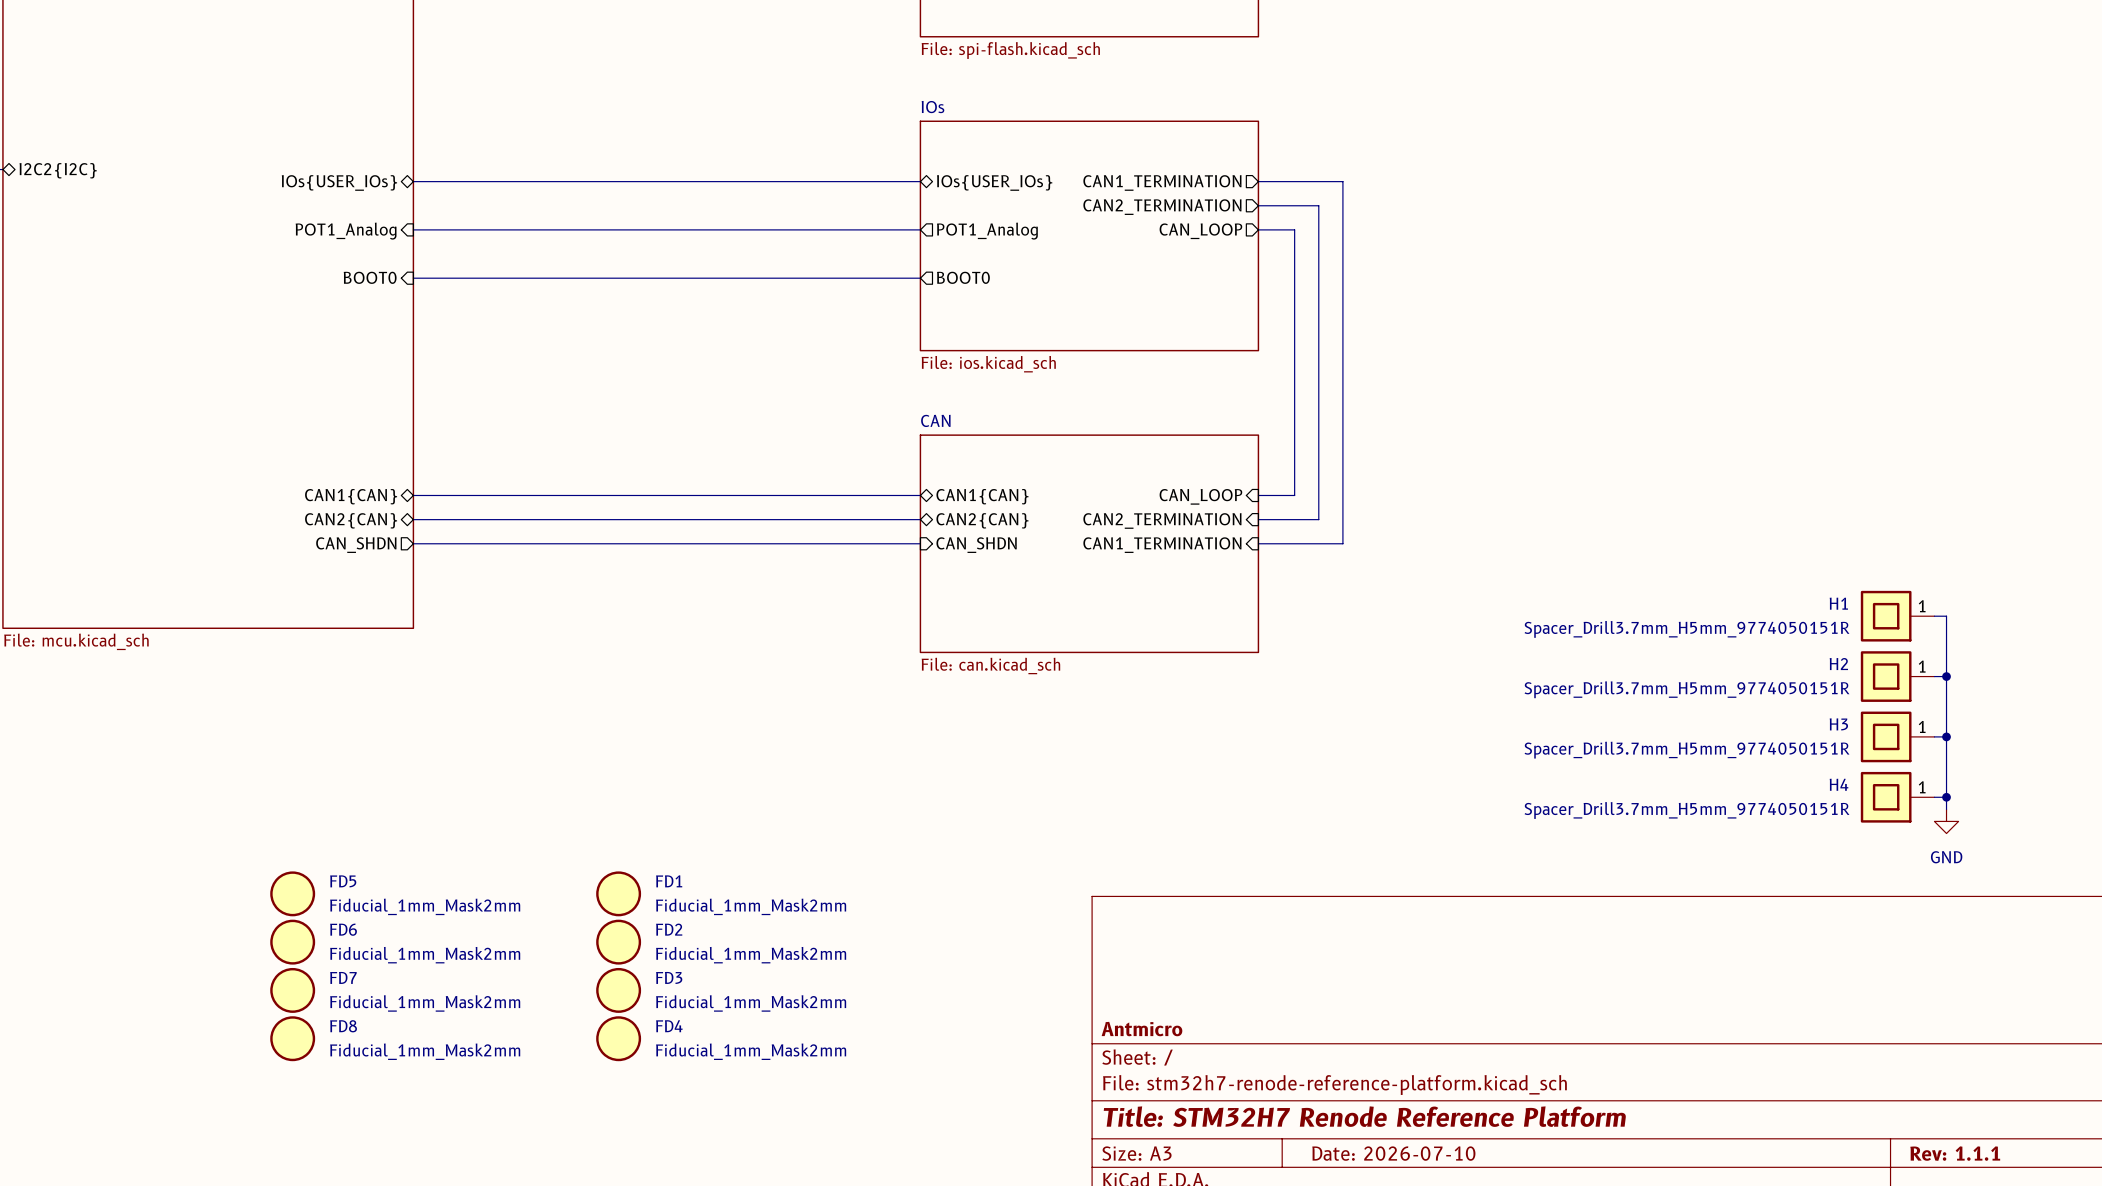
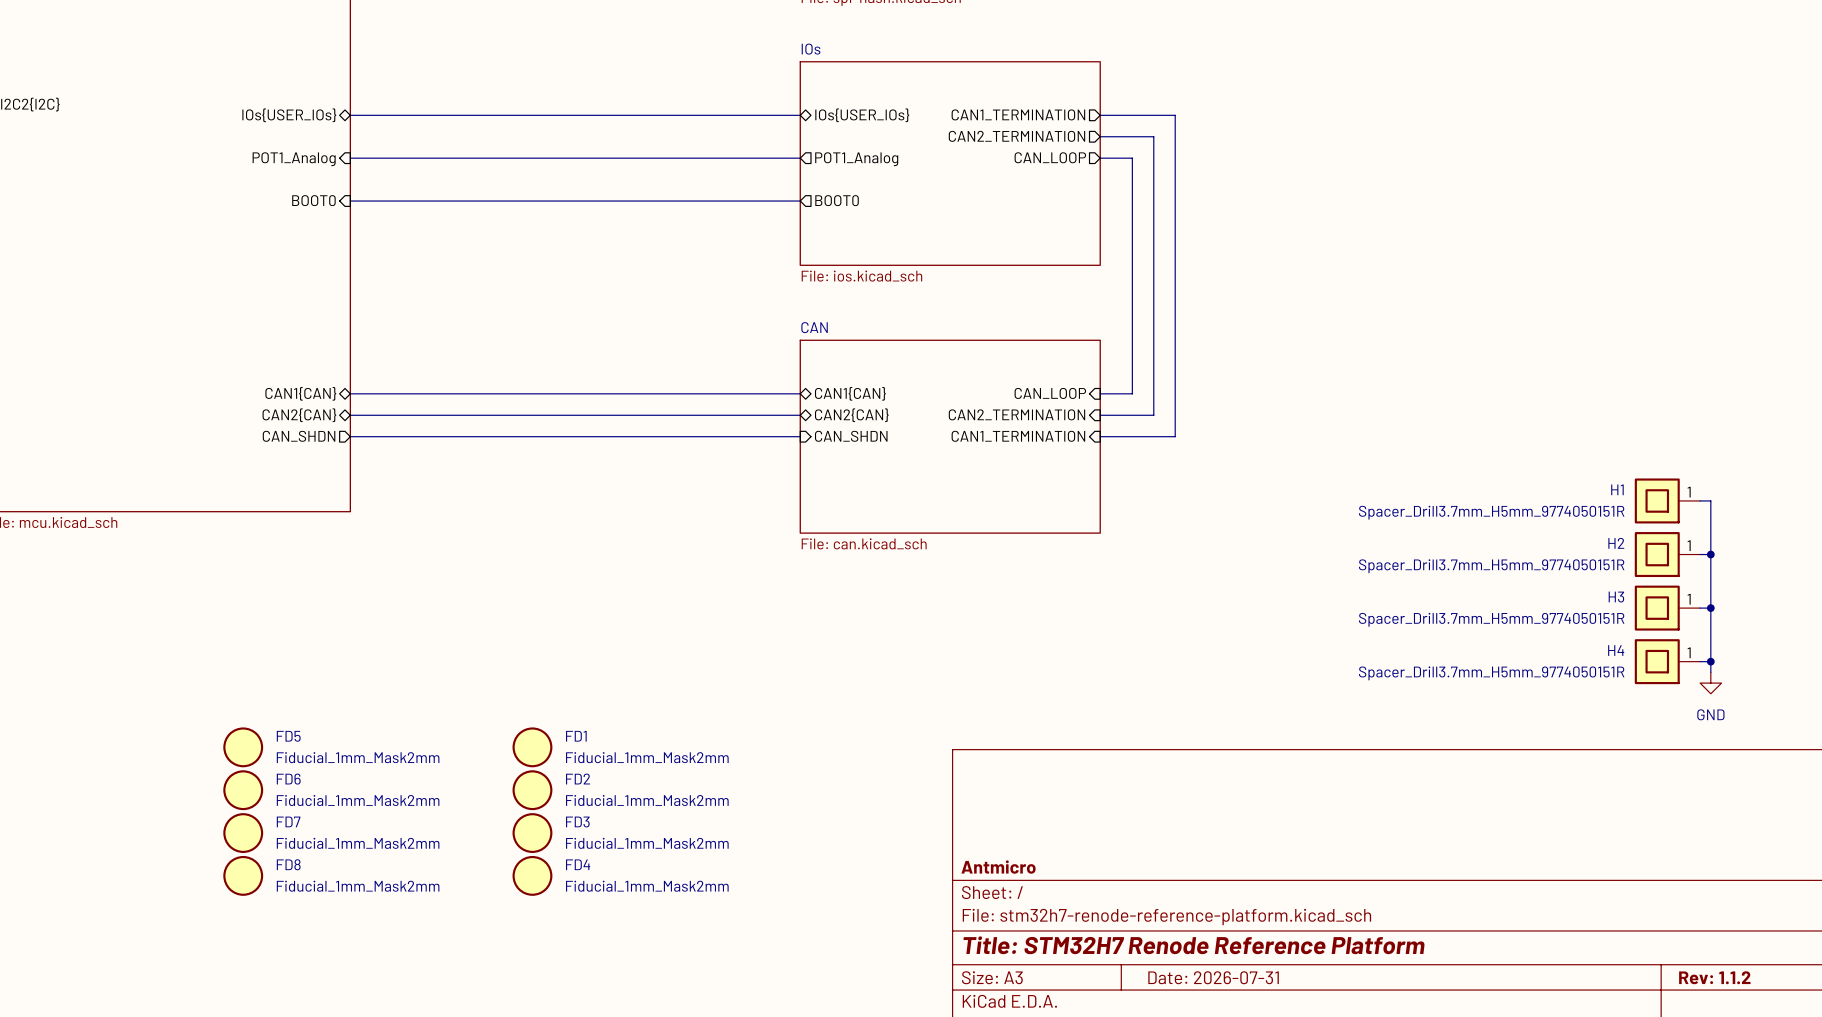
title block: Date: 2026-07-10 (1393, 1153) -> Date: 2026-07-31 (1213, 977)
title block: Rev: 1.1.1 (1955, 1153) -> Rev: 1.1.2 (1714, 977)

